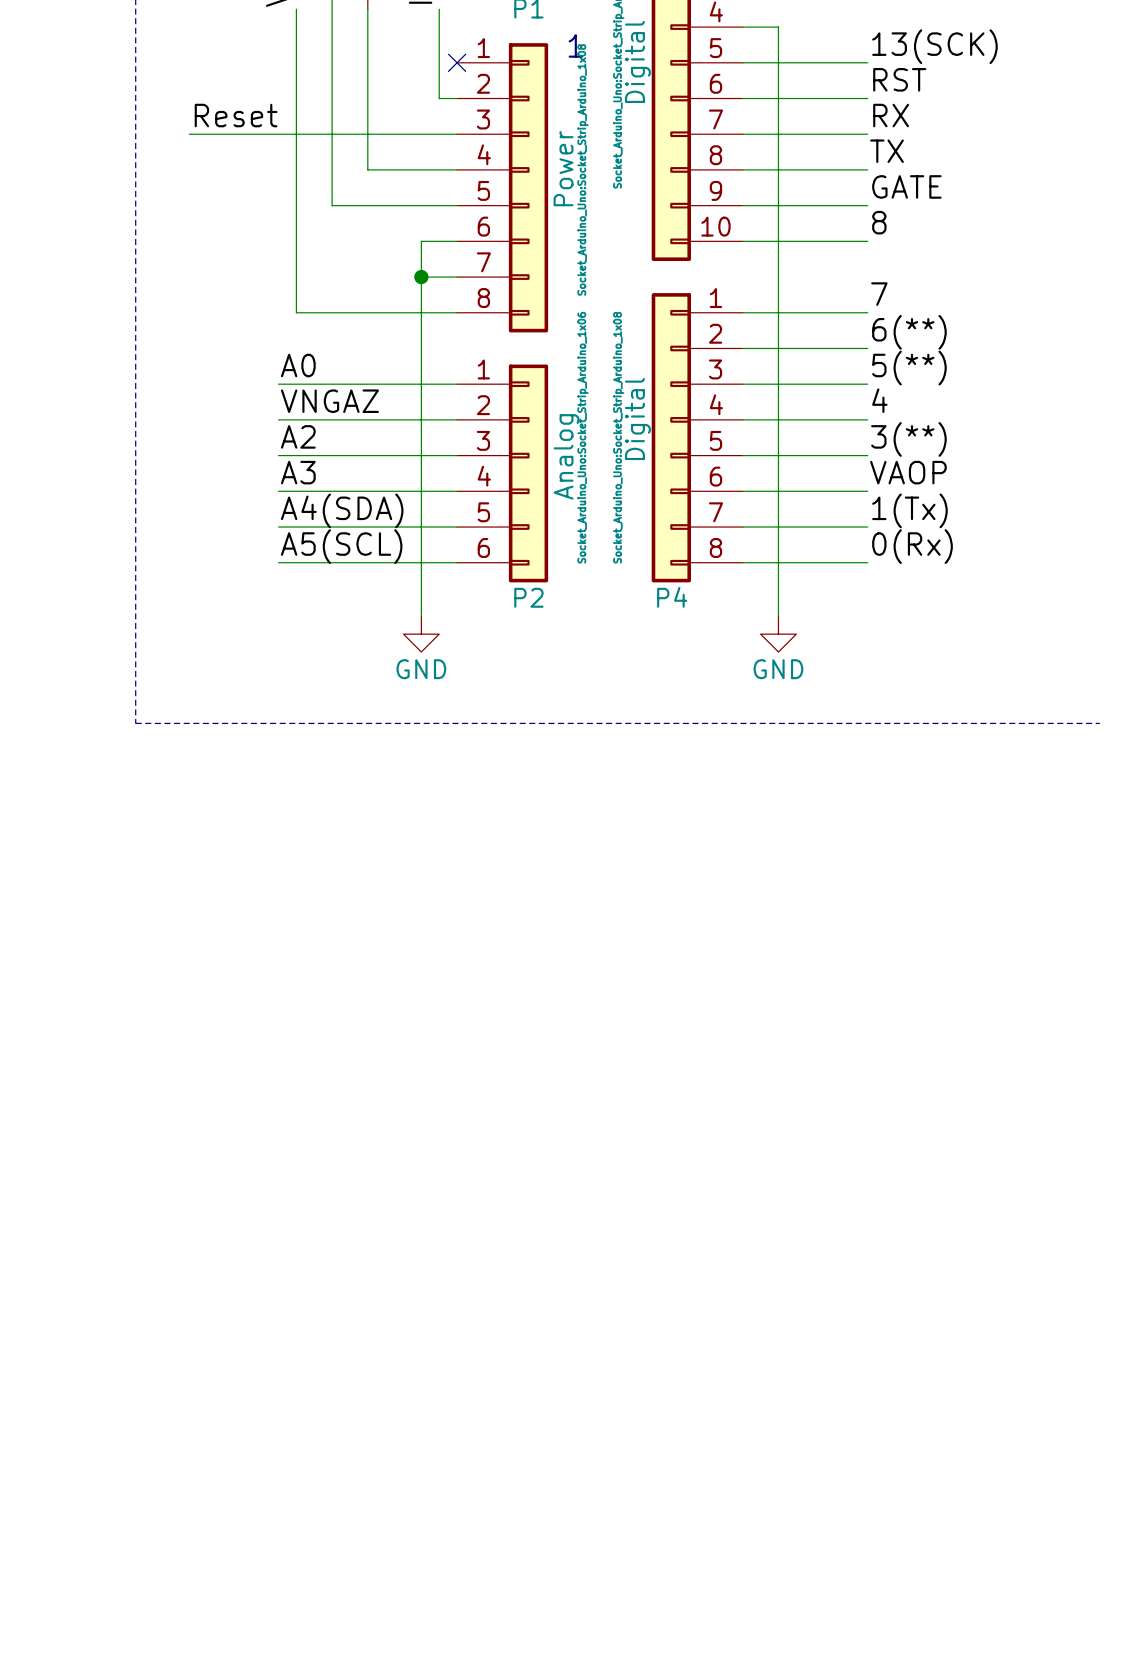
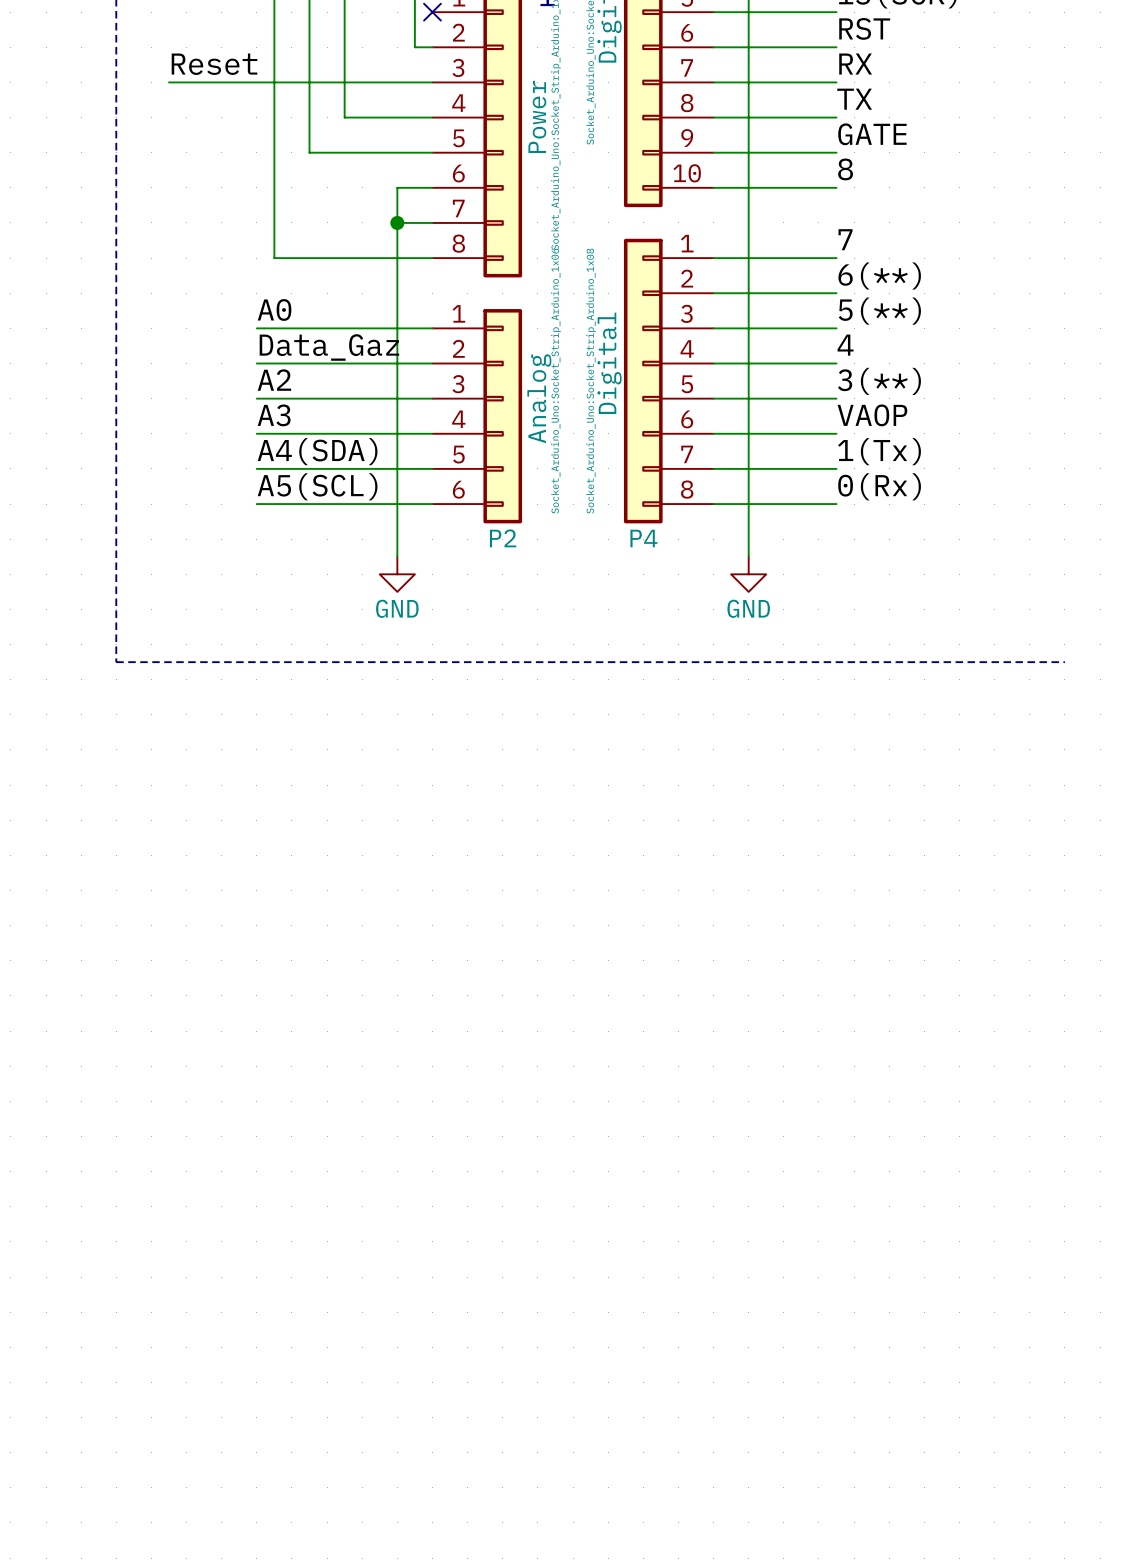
label: VNGAZ (329, 401) -> Data_Gaz (329, 347)

